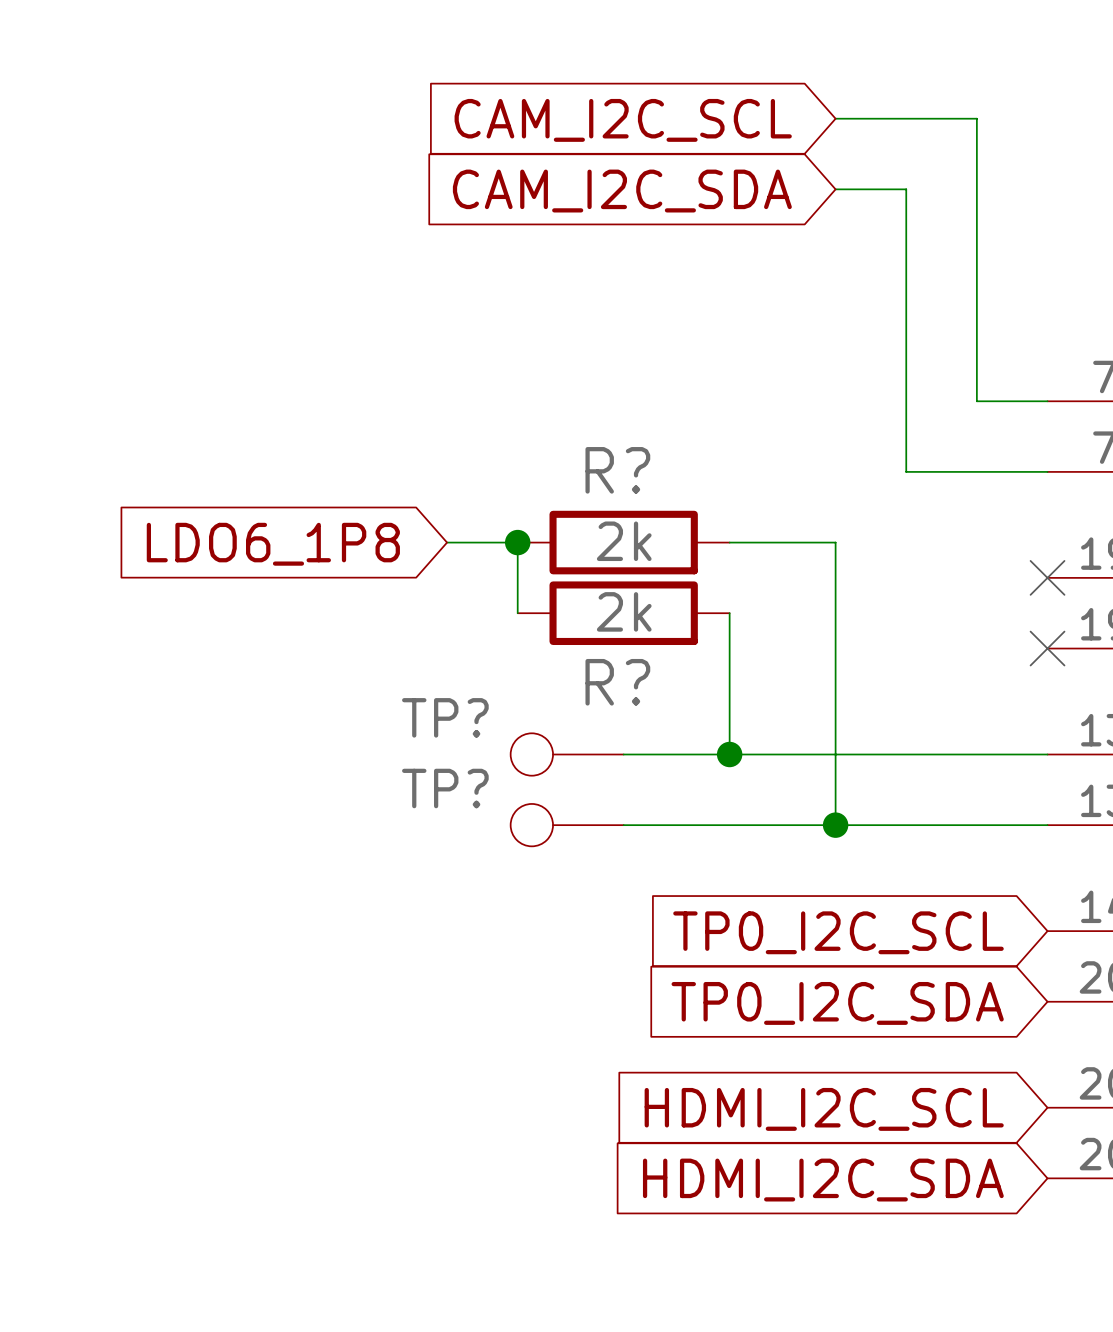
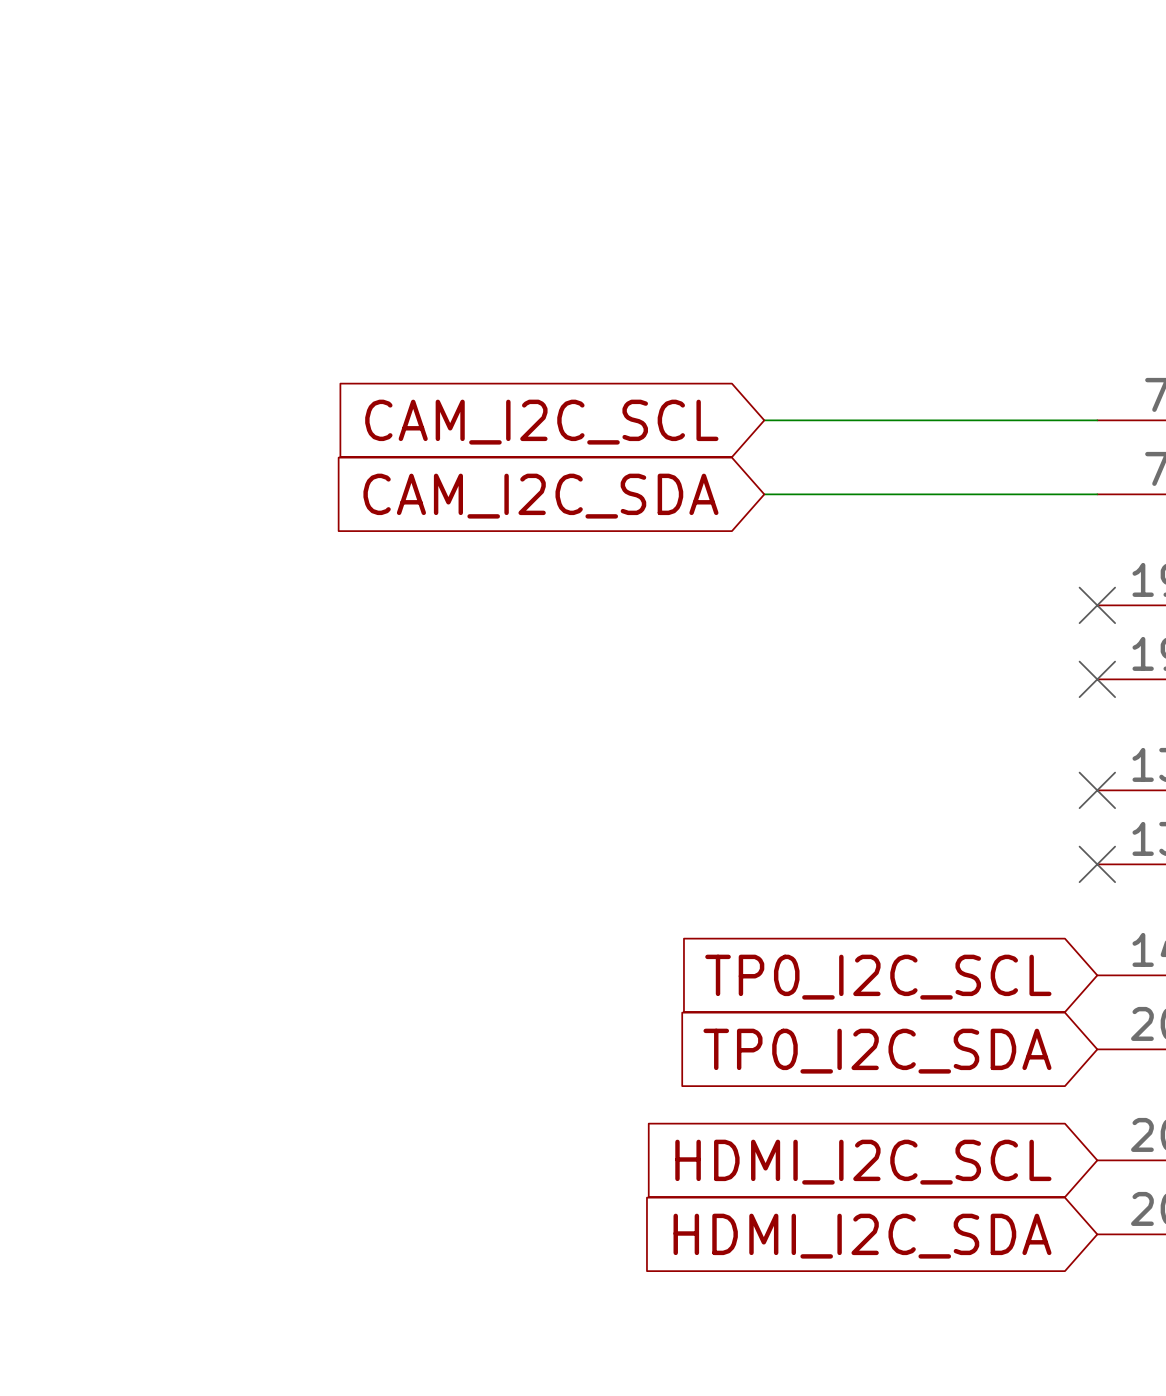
wire: (835, 118) (976, 118) (976, 401) -> (764, 420) (1023, 420)
global label position: CAM_I2C_SCL (623, 120) -> CAM_I2C_SCL (541, 422)
wire: (835, 189) (906, 189) (906, 471) -> (764, 494) (949, 494)
global label position: CAM_I2C_SDA (622, 191) -> CAM_I2C_SDA (540, 496)
wire: (447, 542) (517, 542) (517, 613) -> none
junction: (517, 542) -> none
R?: (623, 542) -> none
wire: (729, 542) (835, 542) (835, 825) -> none
global label: LDO6_1P8 (273, 544) -> none
R?: (623, 613) -> none
wire: (729, 613) (729, 754) -> none
TP?: (567, 754) -> none
wire: (623, 754) (1047, 754) -> none
junction: (729, 754) -> none
no-connect mark: none -> (1097, 790)
TP?: (567, 825) -> none
wire: (623, 825) (1047, 825) -> none
junction: (835, 825) -> none
no-connect mark: none -> (1097, 864)

